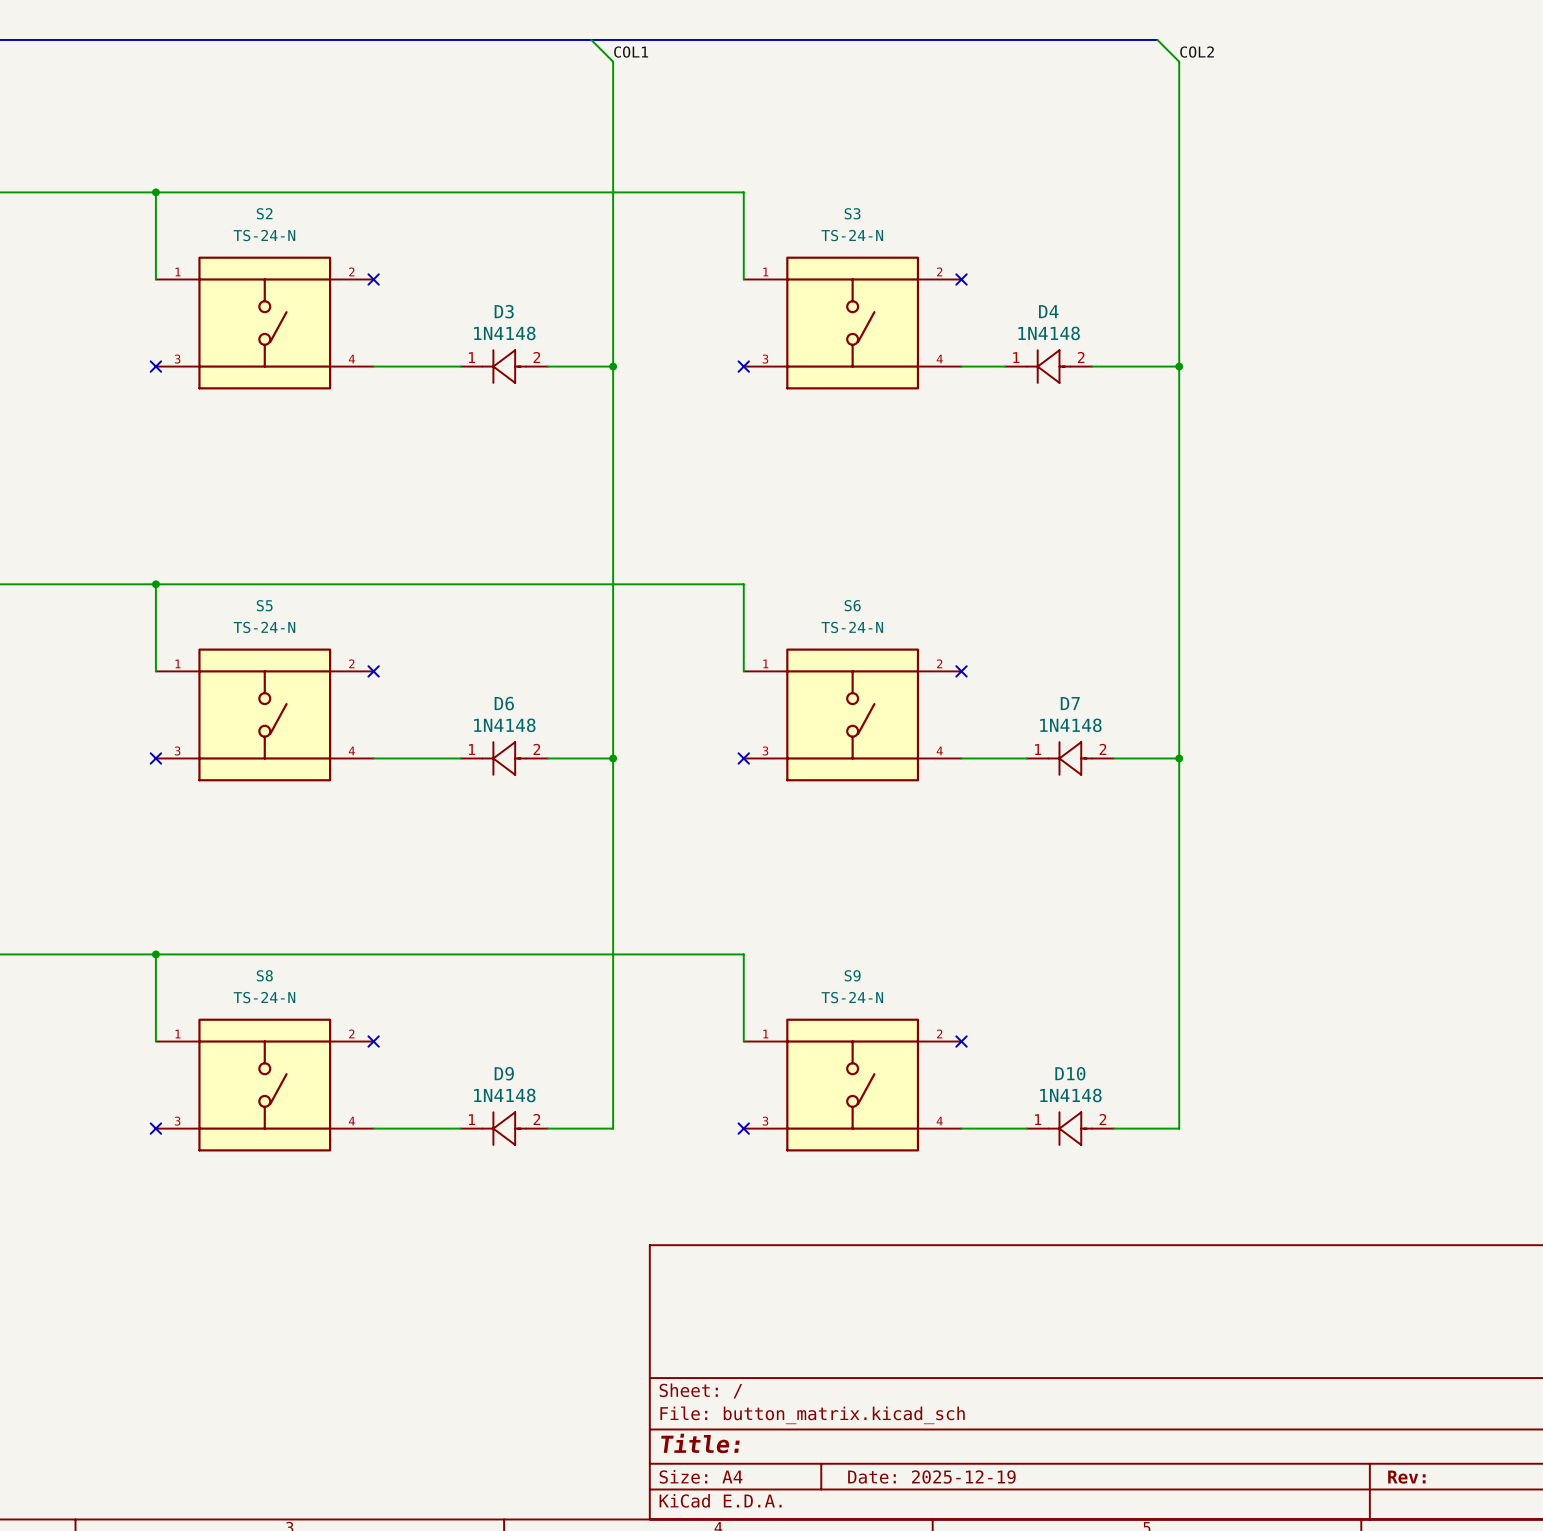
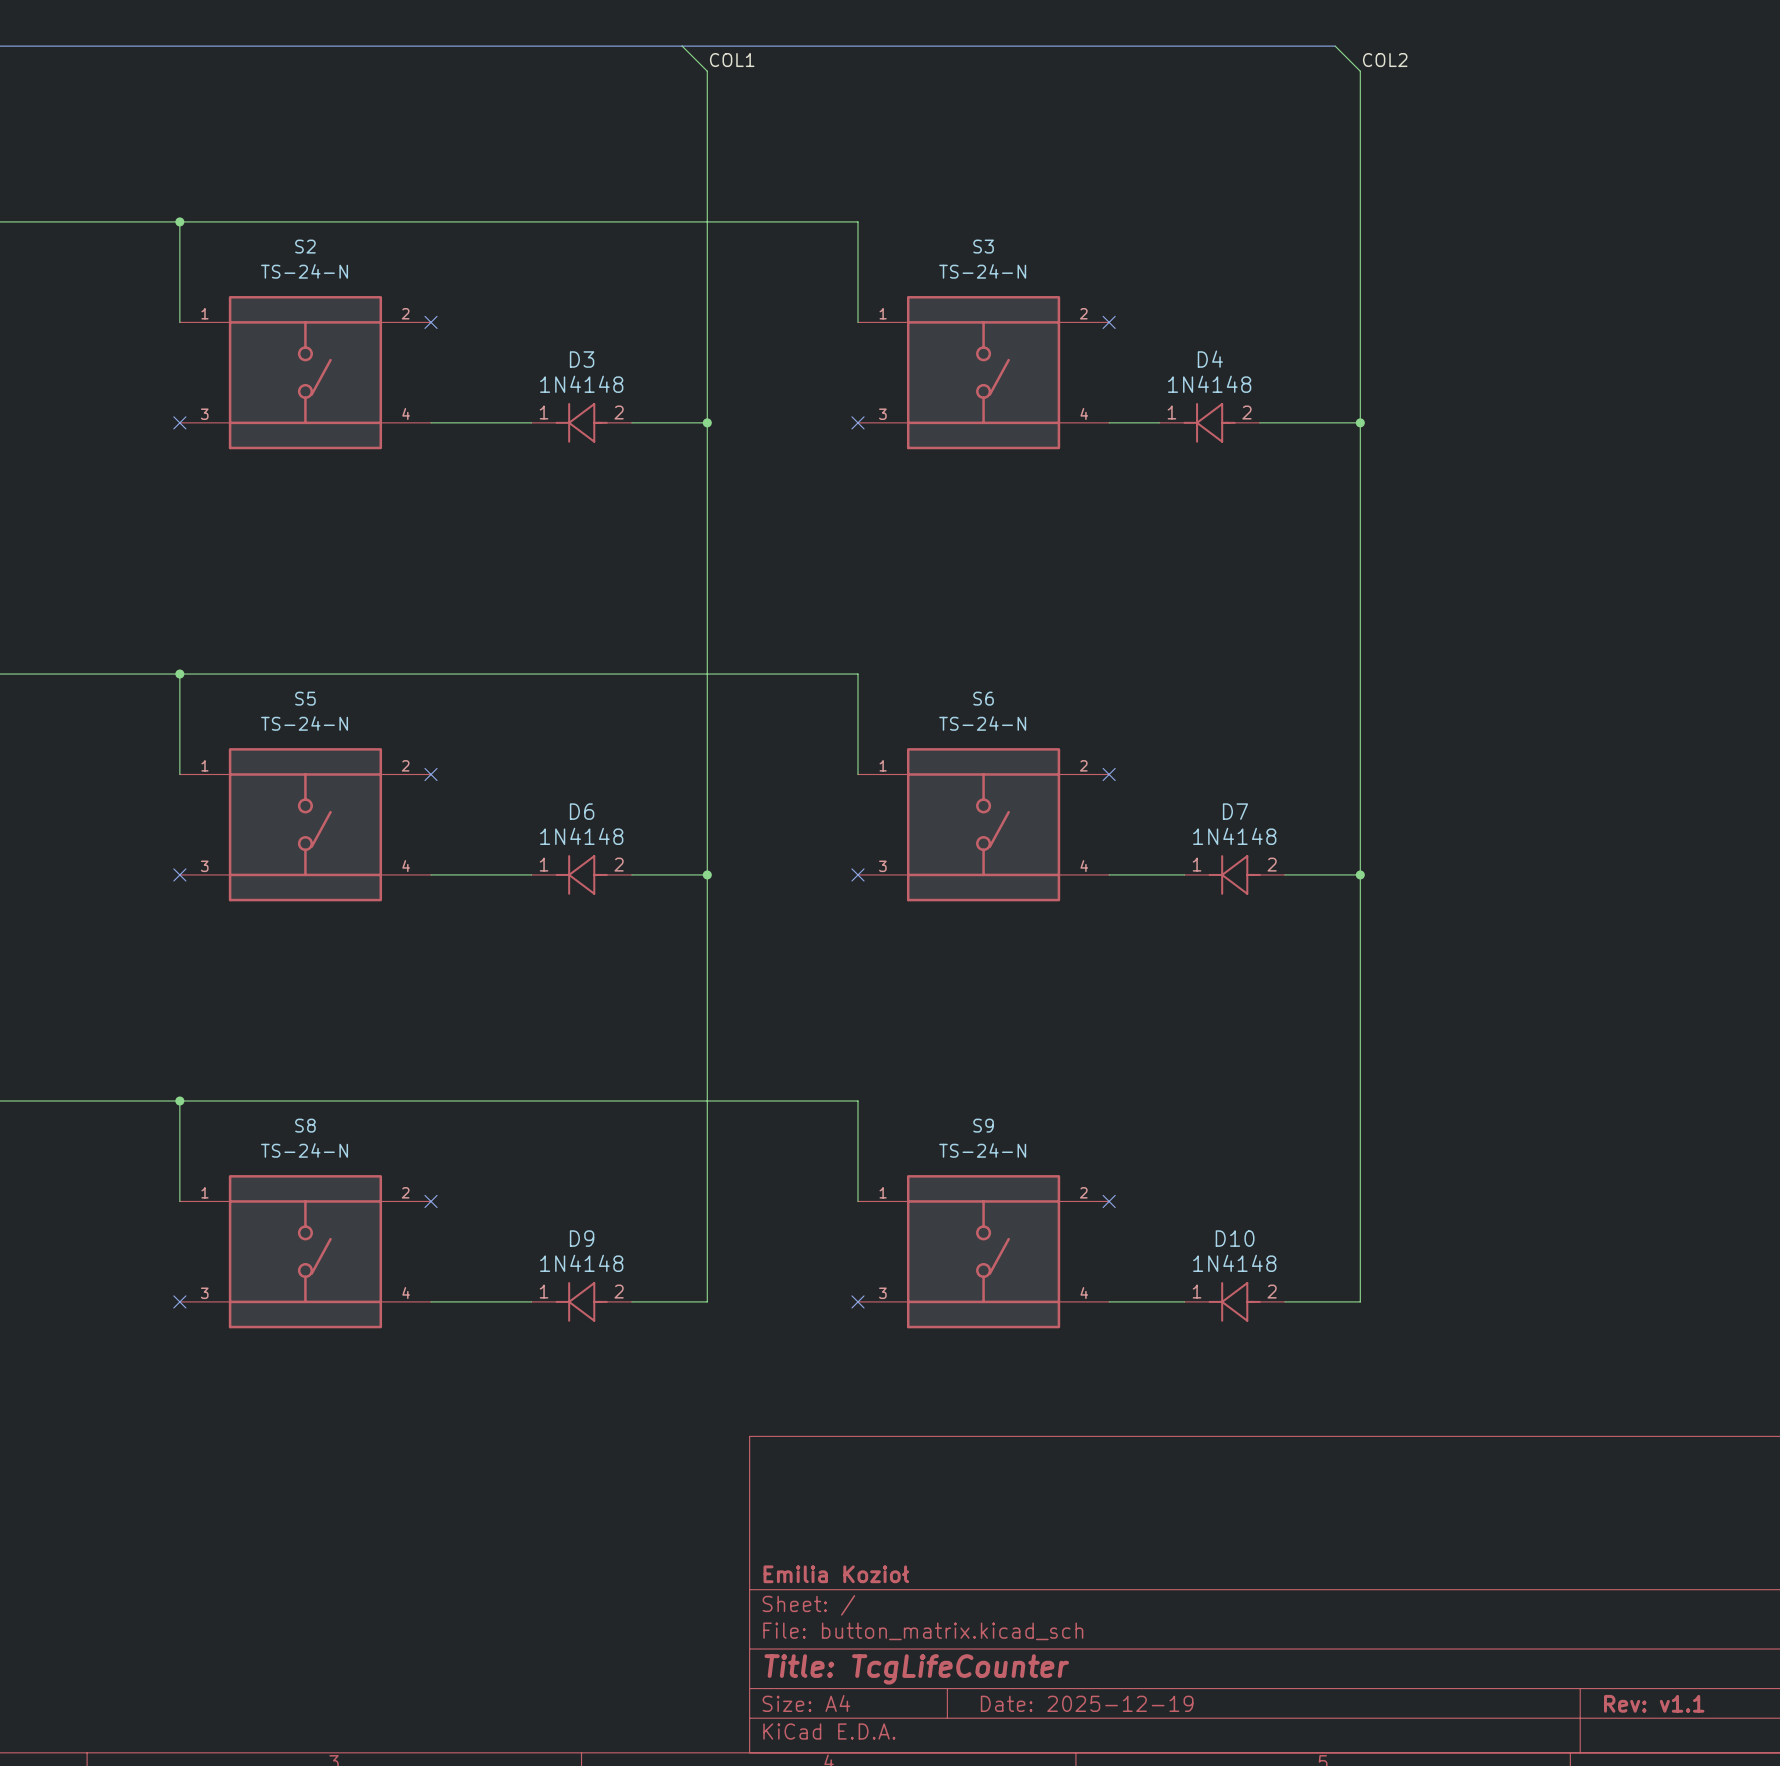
title block: none -> Emilia Kozioł (836, 1574)
title block: Title: (700, 1443) -> Title: TcgLifeCounter (916, 1669)
title block: Rev: (1406, 1477) -> Rev: v1.1 (1654, 1703)

